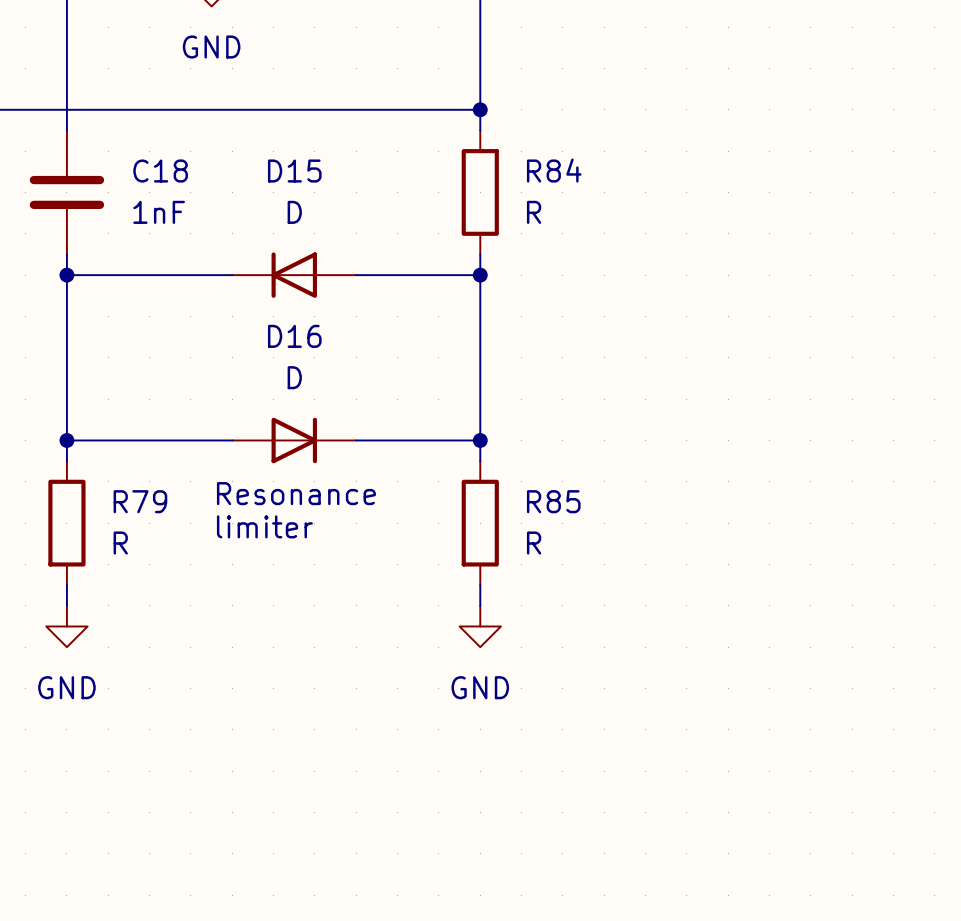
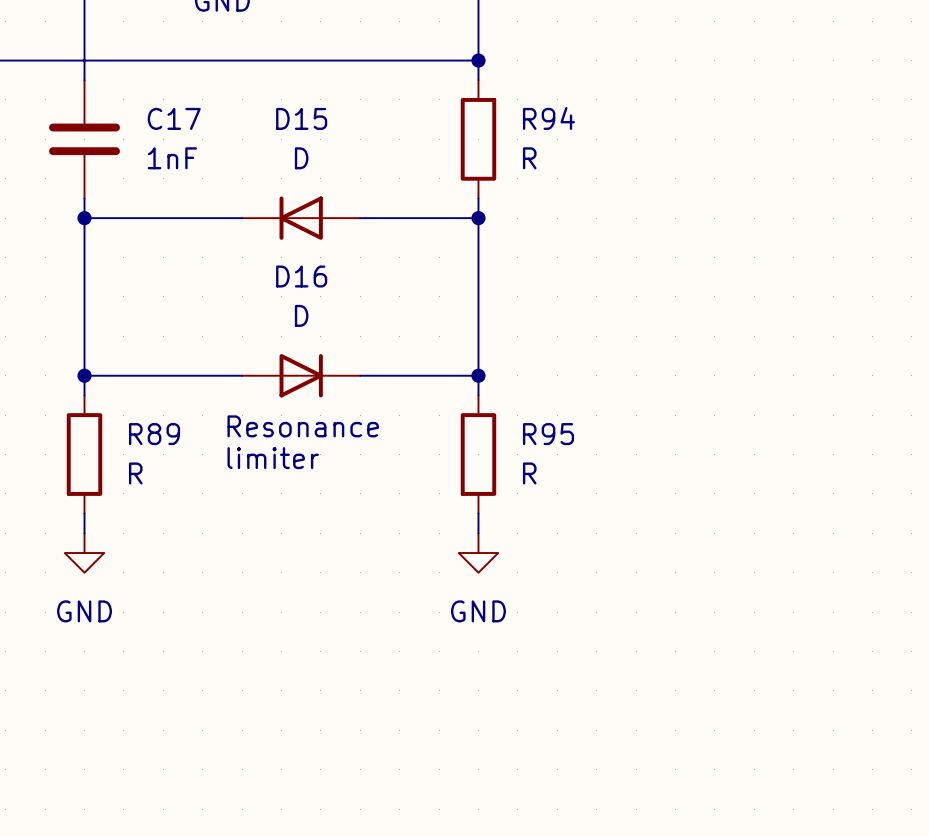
R84 name: R84 (554, 170) -> R94 (548, 118)
C18 name: C18 (160, 171) -> C17 (174, 118)
R79 name: R79 (140, 501) -> R89 (154, 434)
R85 name: R85 (553, 501) -> R95 (548, 434)

